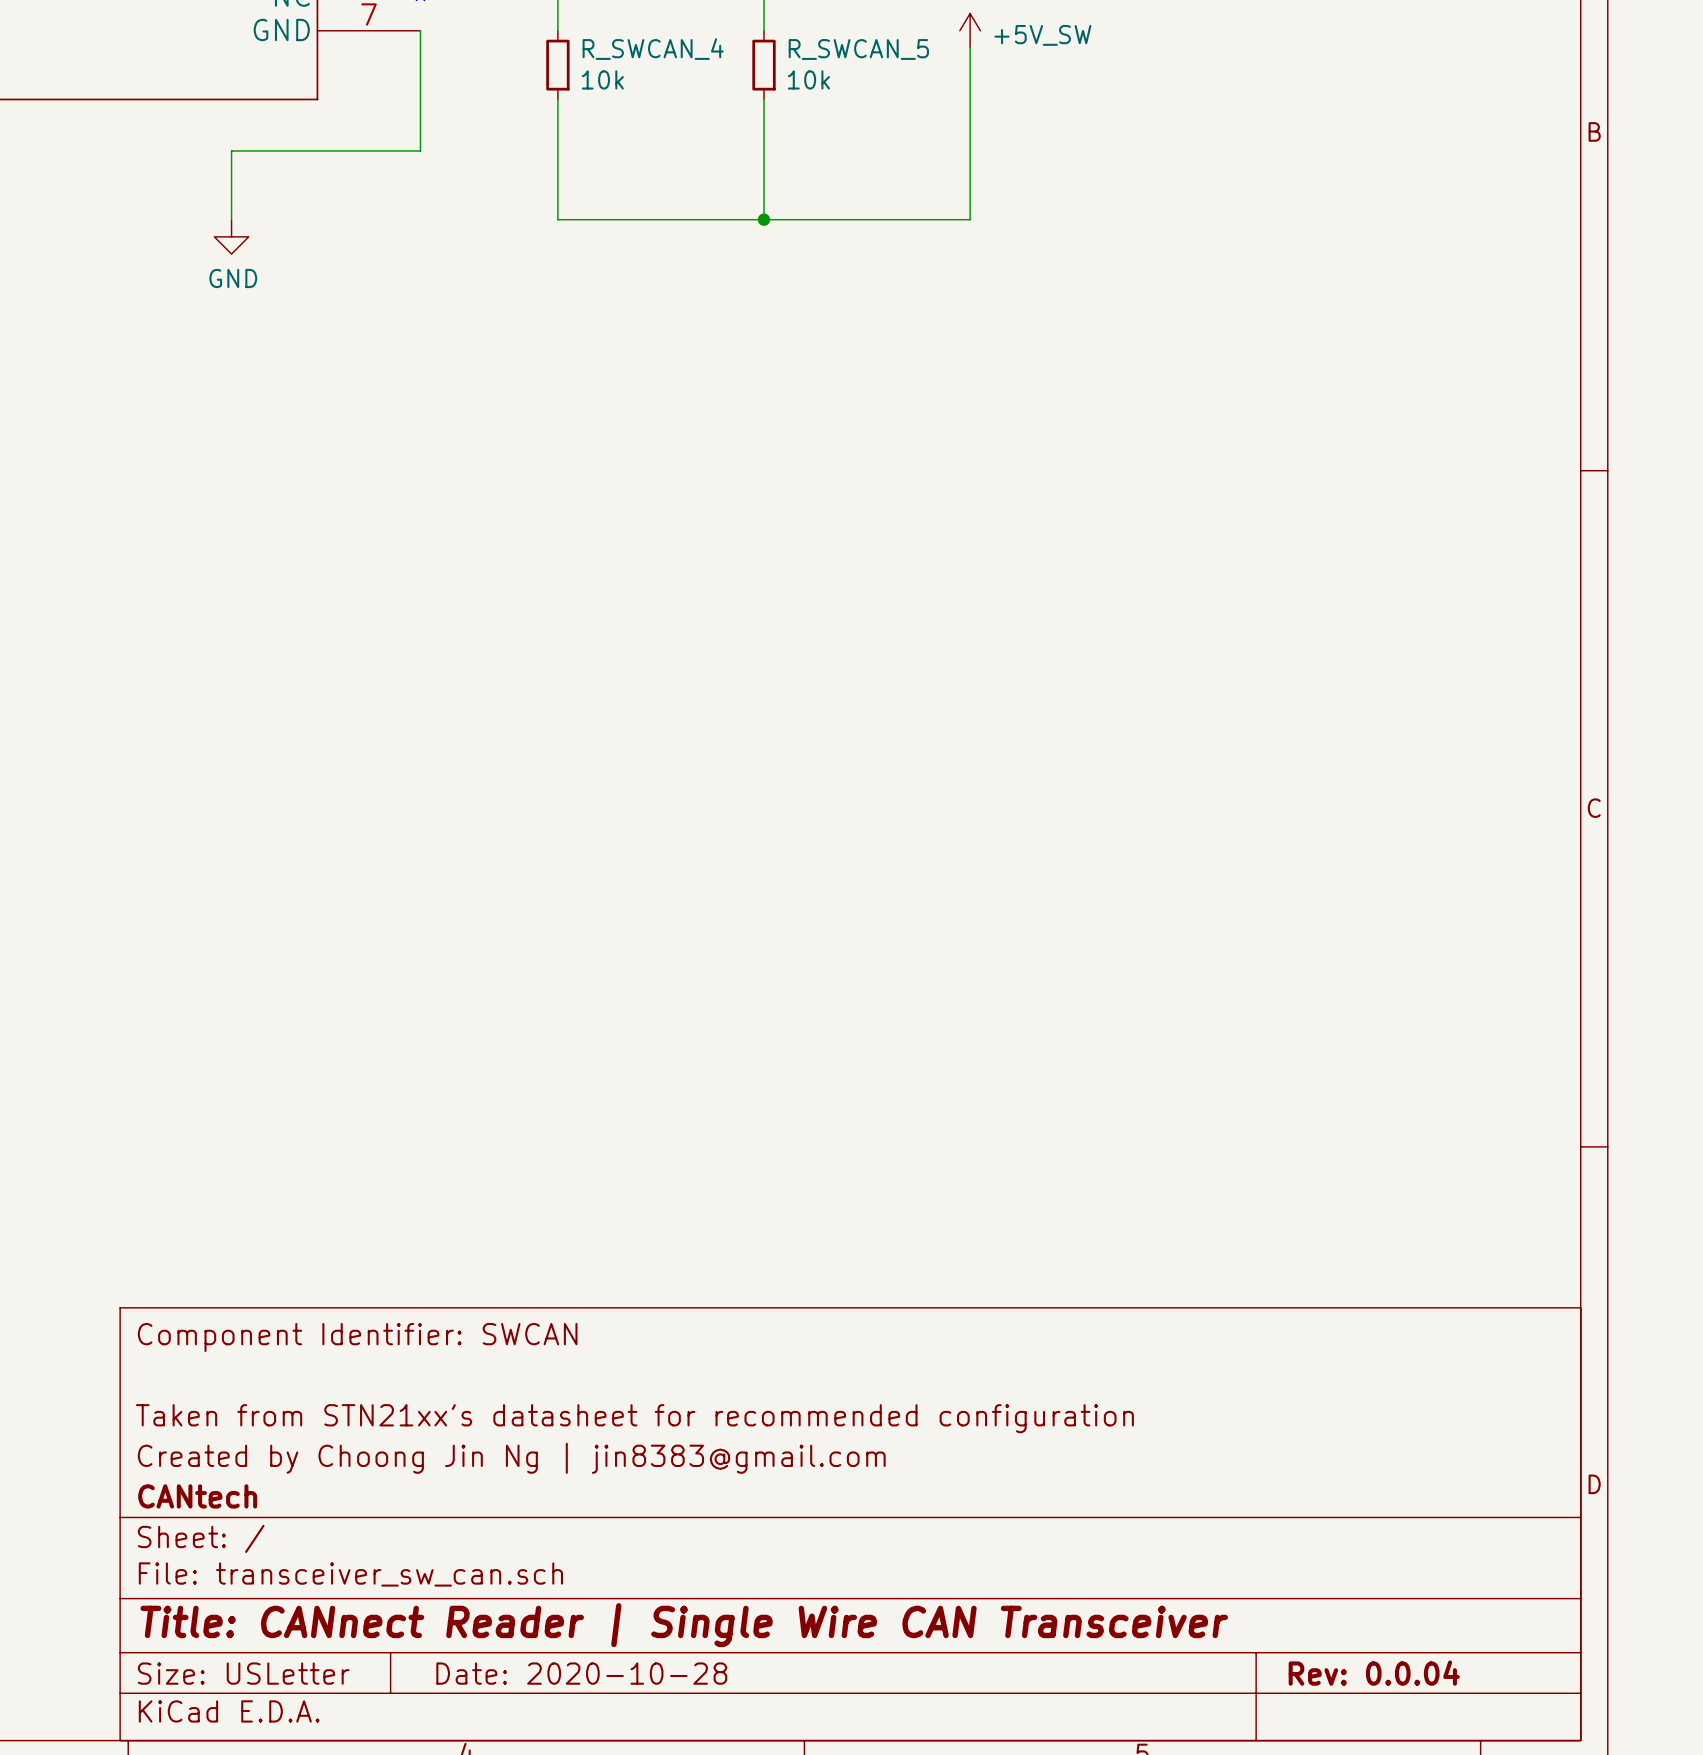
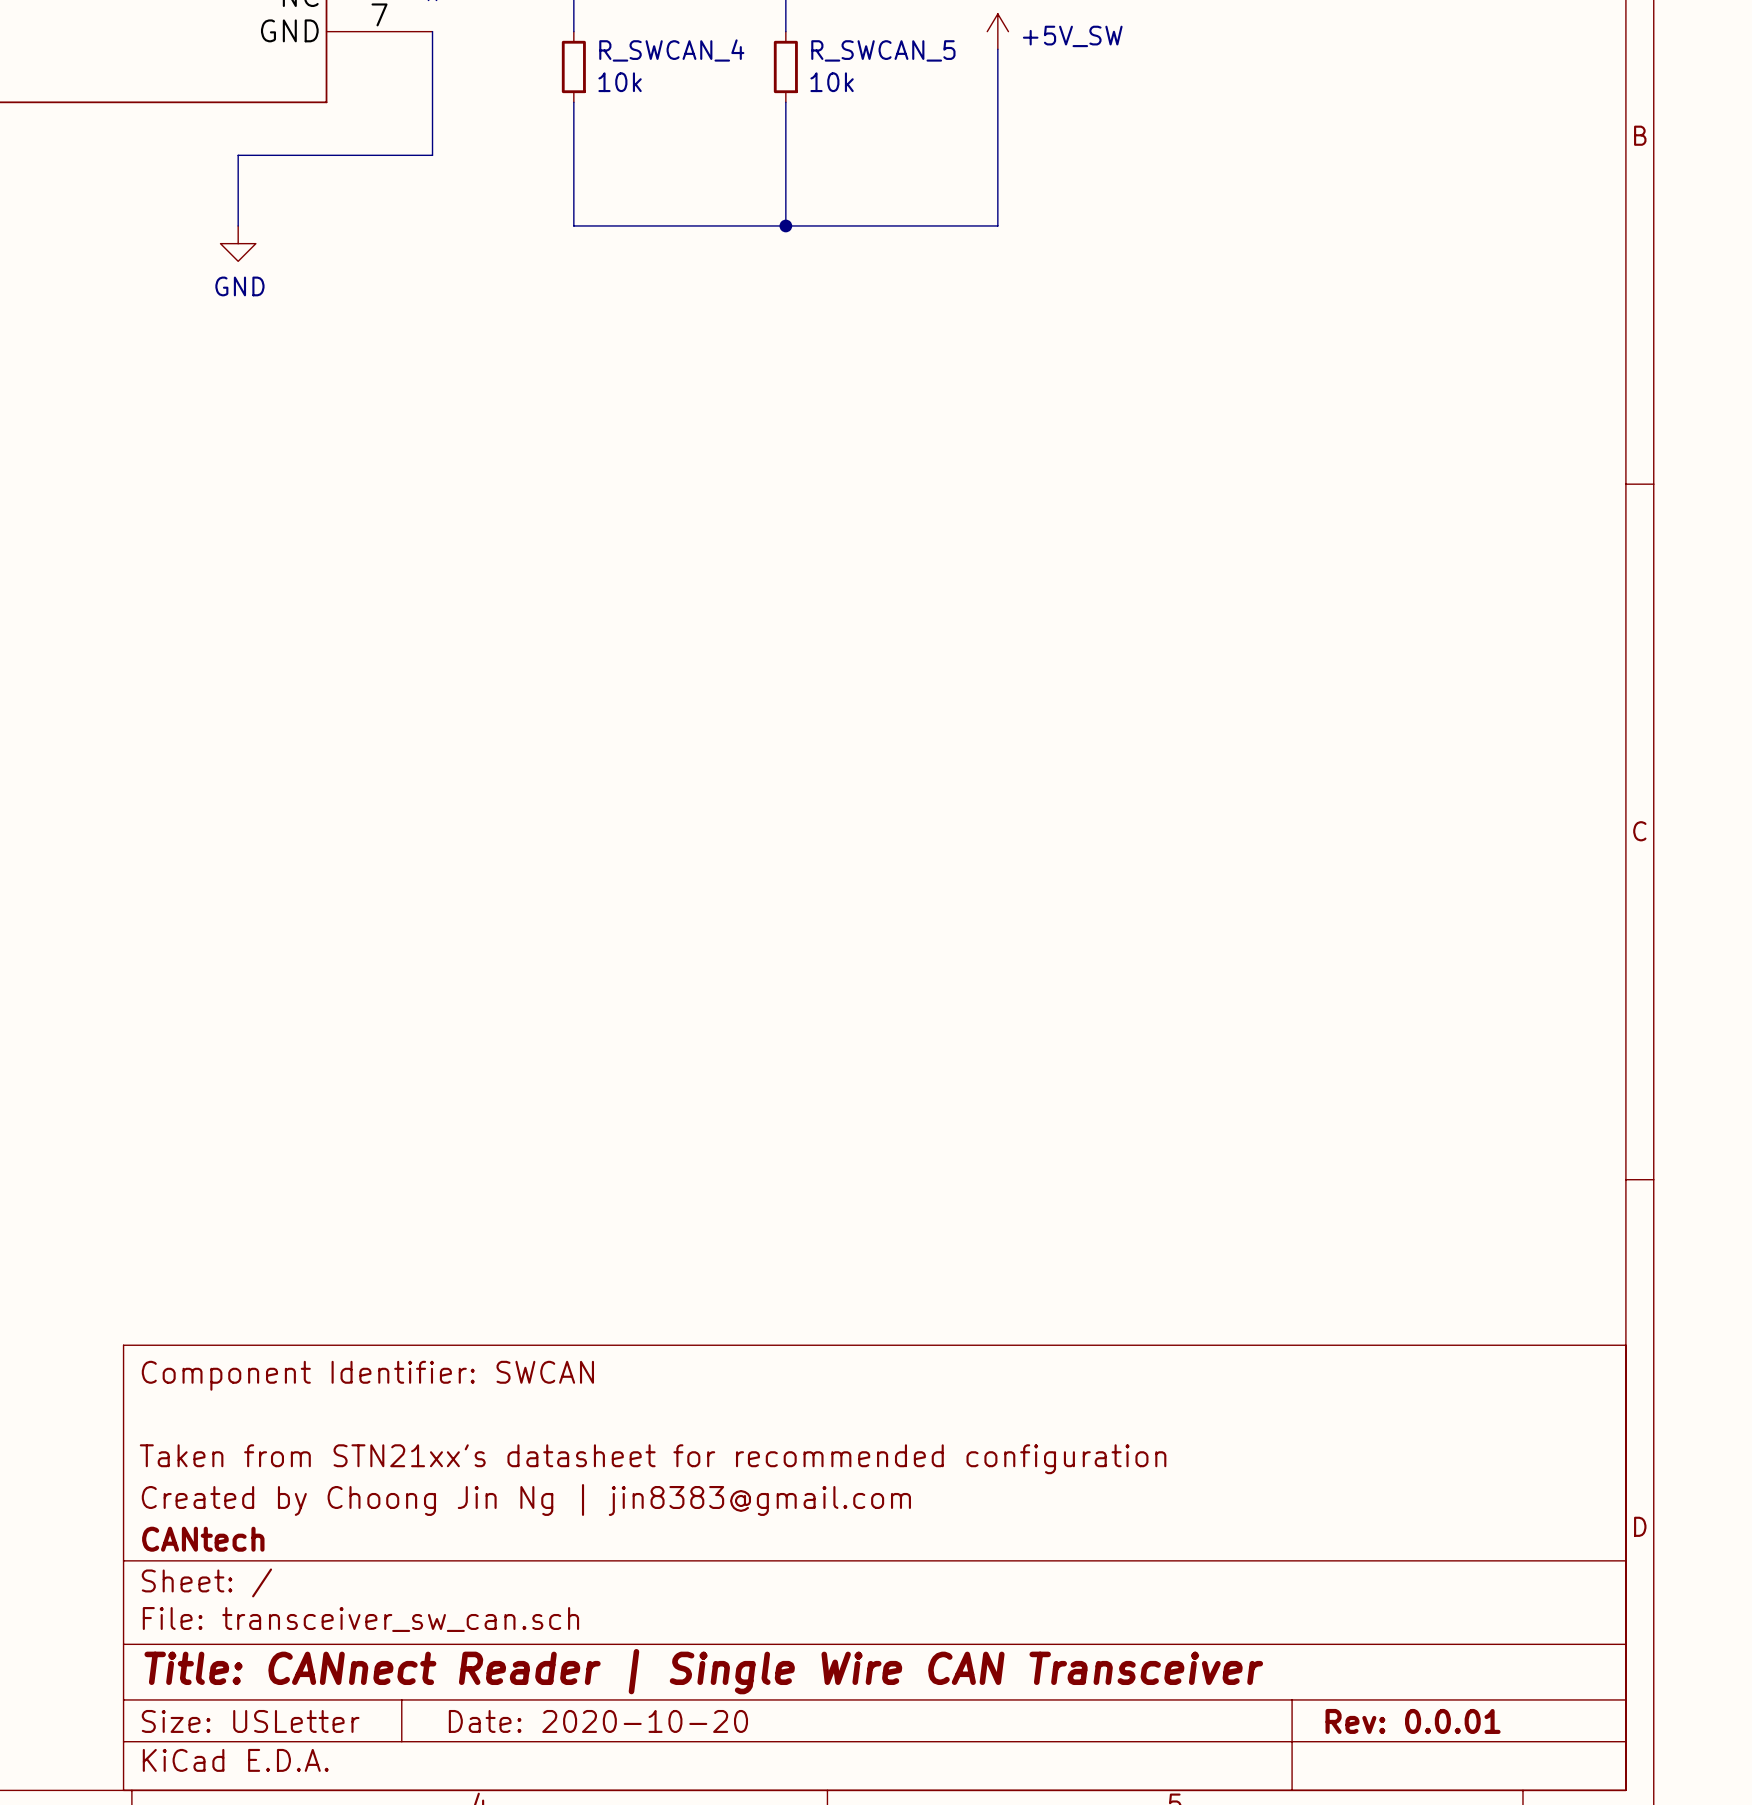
title block: Date: 2020-10-28 (581, 1673) -> Date: 2020-10-20 (598, 1721)
title block: Rev: 0.0.04 (1374, 1673) -> Rev: 0.0.01 (1413, 1721)

